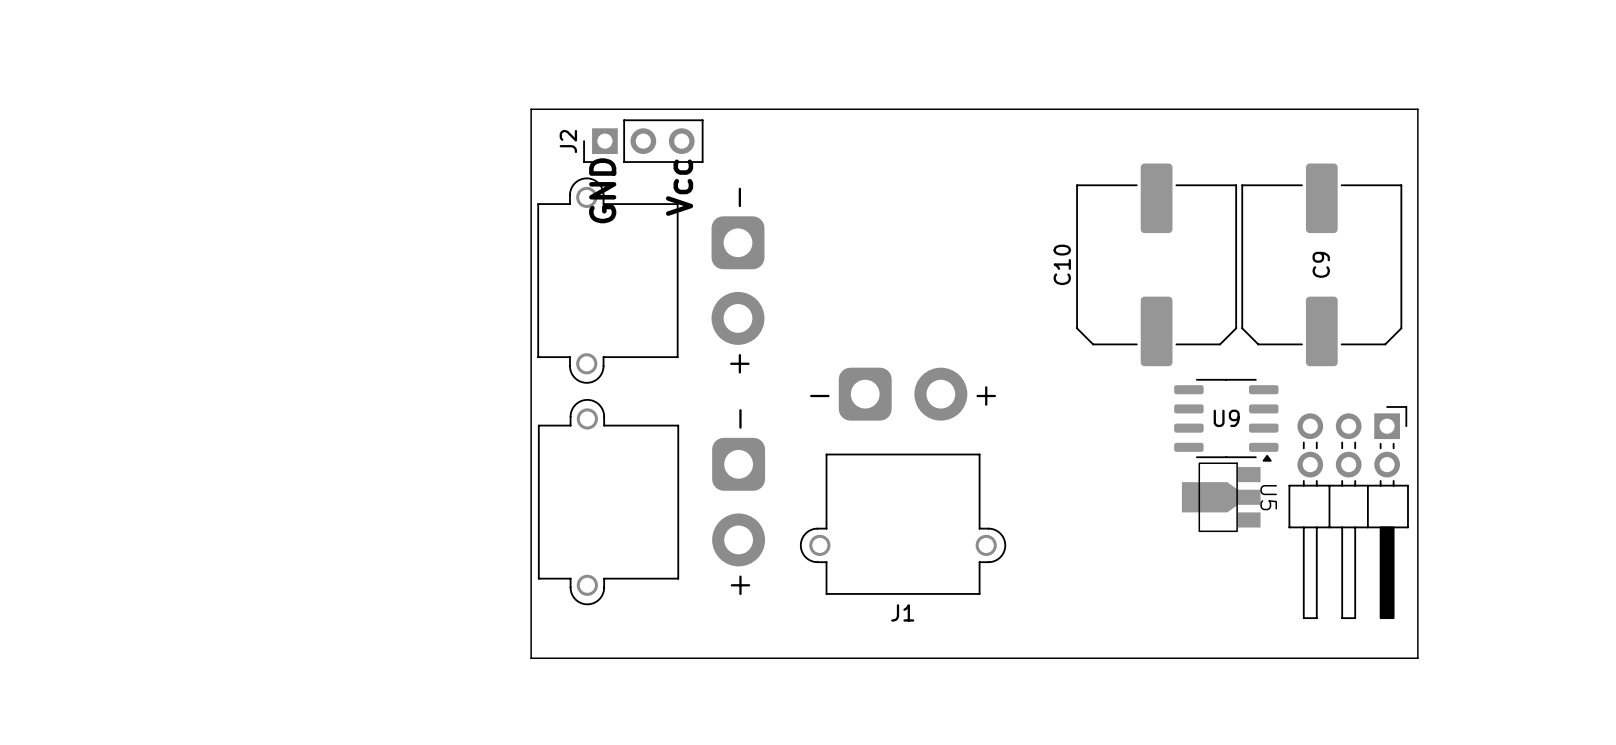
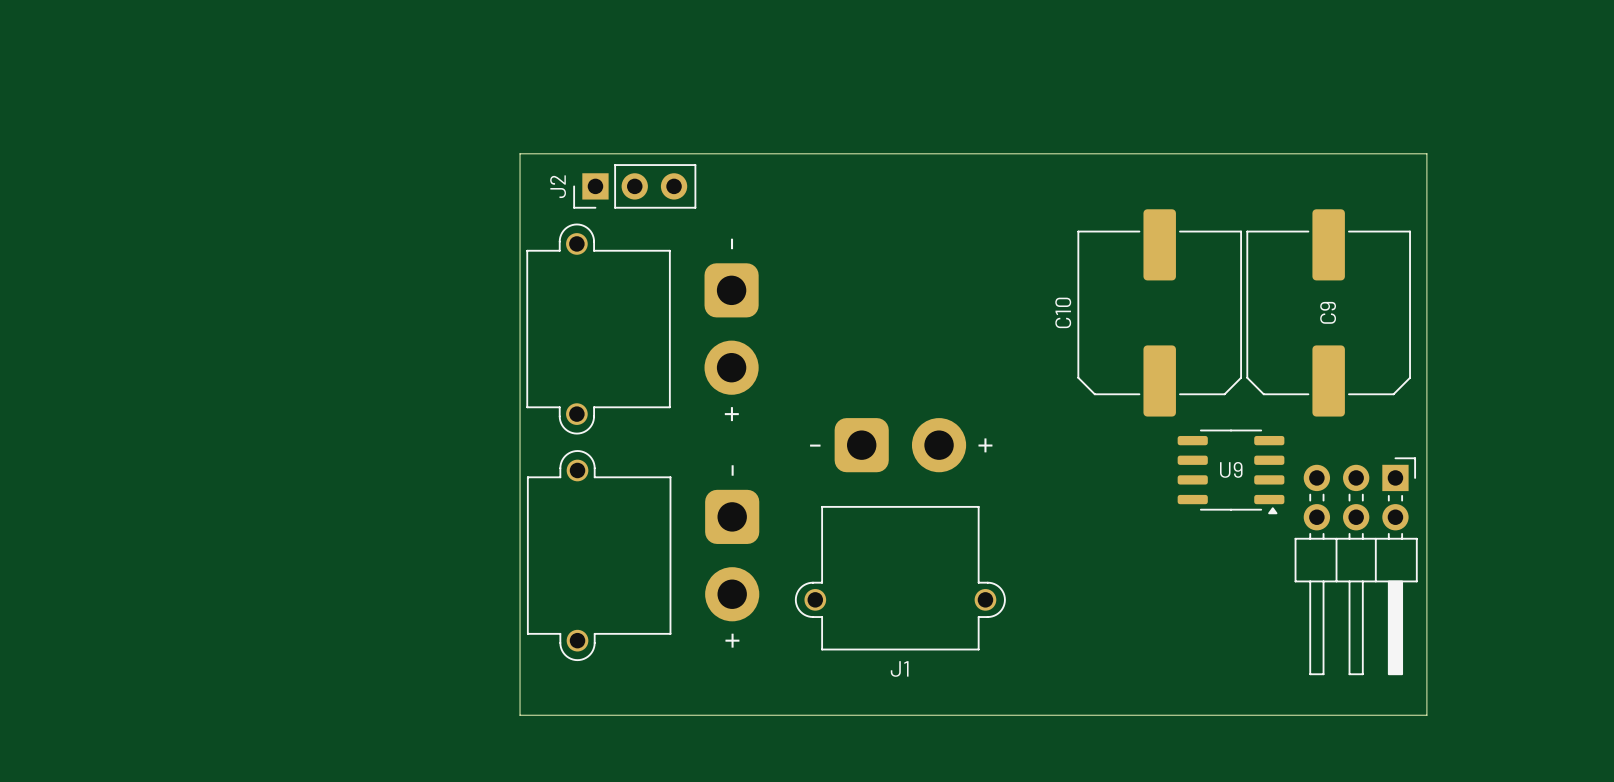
text: Vcc (679, 187) -> none
text: GND (602, 190) -> none
U5: (1221, 497) -> none

